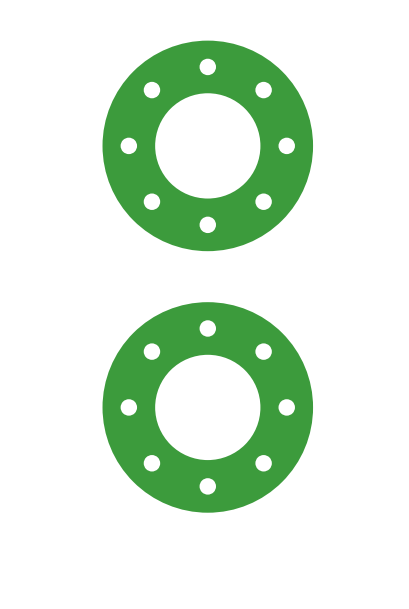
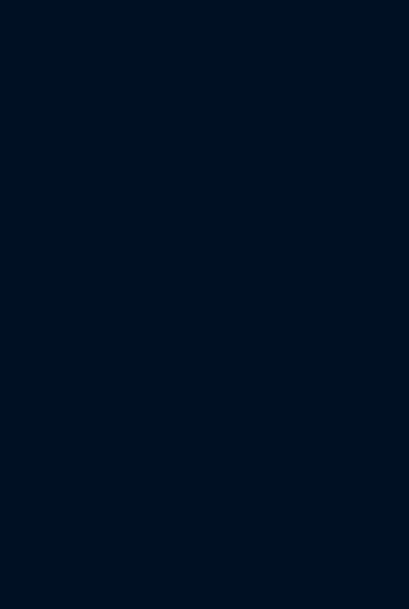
part: (207, 145) -> none
part: (207, 407) -> none

